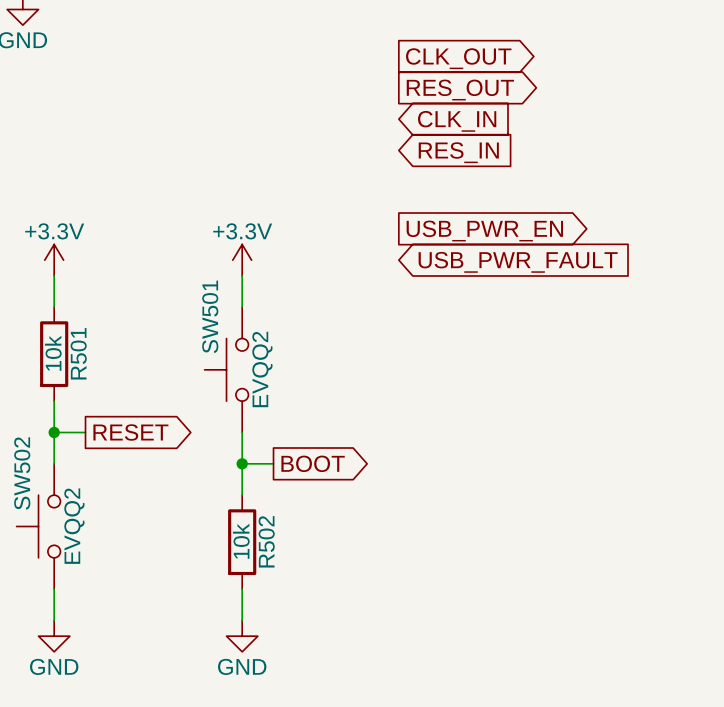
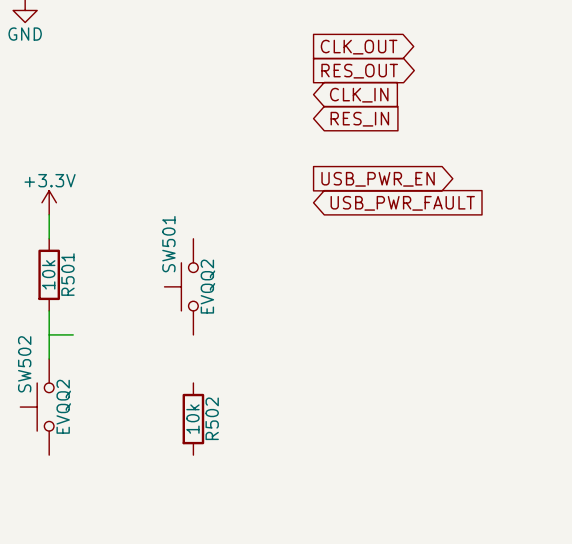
power symbol: +3.3V (242, 260) -> none
wire: (242, 275) (242, 307) -> none
junction: (54, 432) -> none
global label: RESET (130, 432) -> none
wire: (242, 432) (242, 495) -> none
wire: (242, 463) (273, 463) -> none
junction: (242, 463) -> none
global label: BOOT (313, 463) -> none
wire: (54, 589) (54, 620) -> none
wire: (242, 589) (242, 620) -> none
power symbol: GND (54, 636) -> none
power symbol: GND (242, 636) -> none

